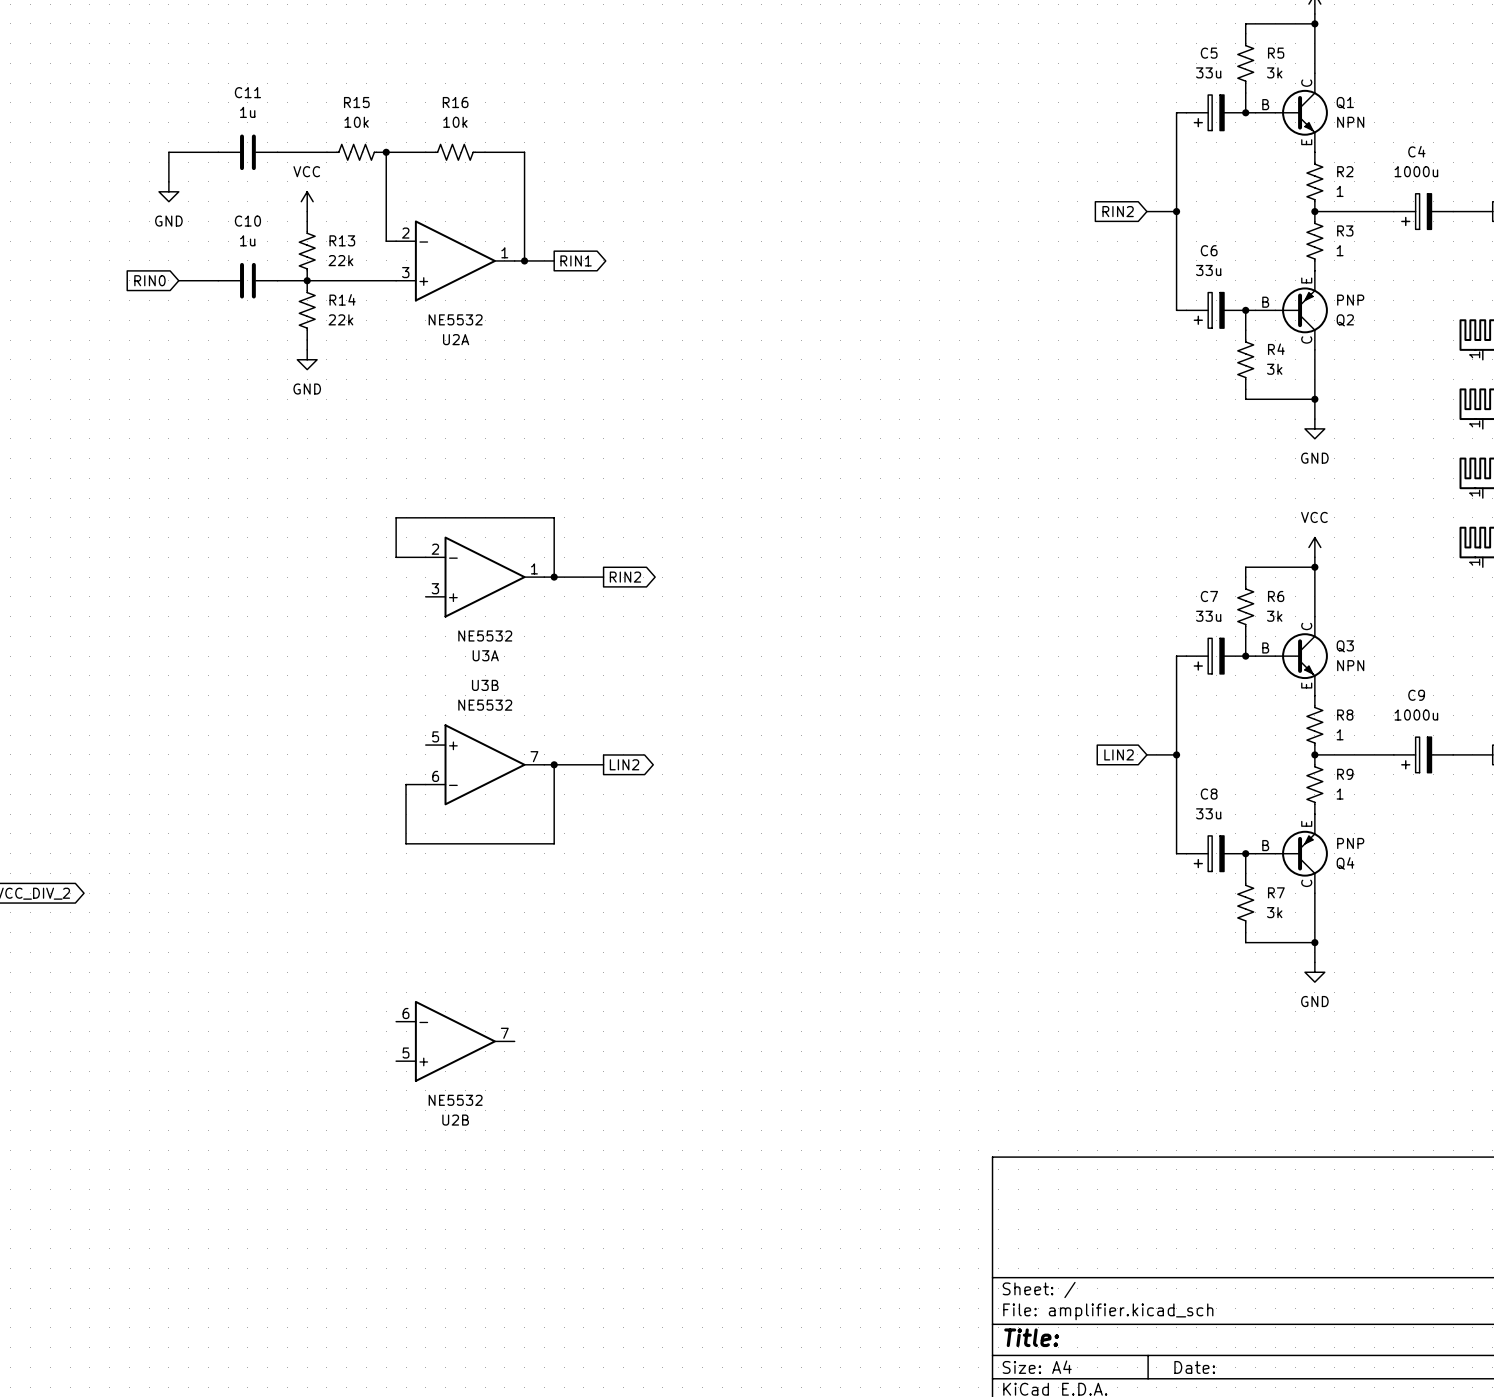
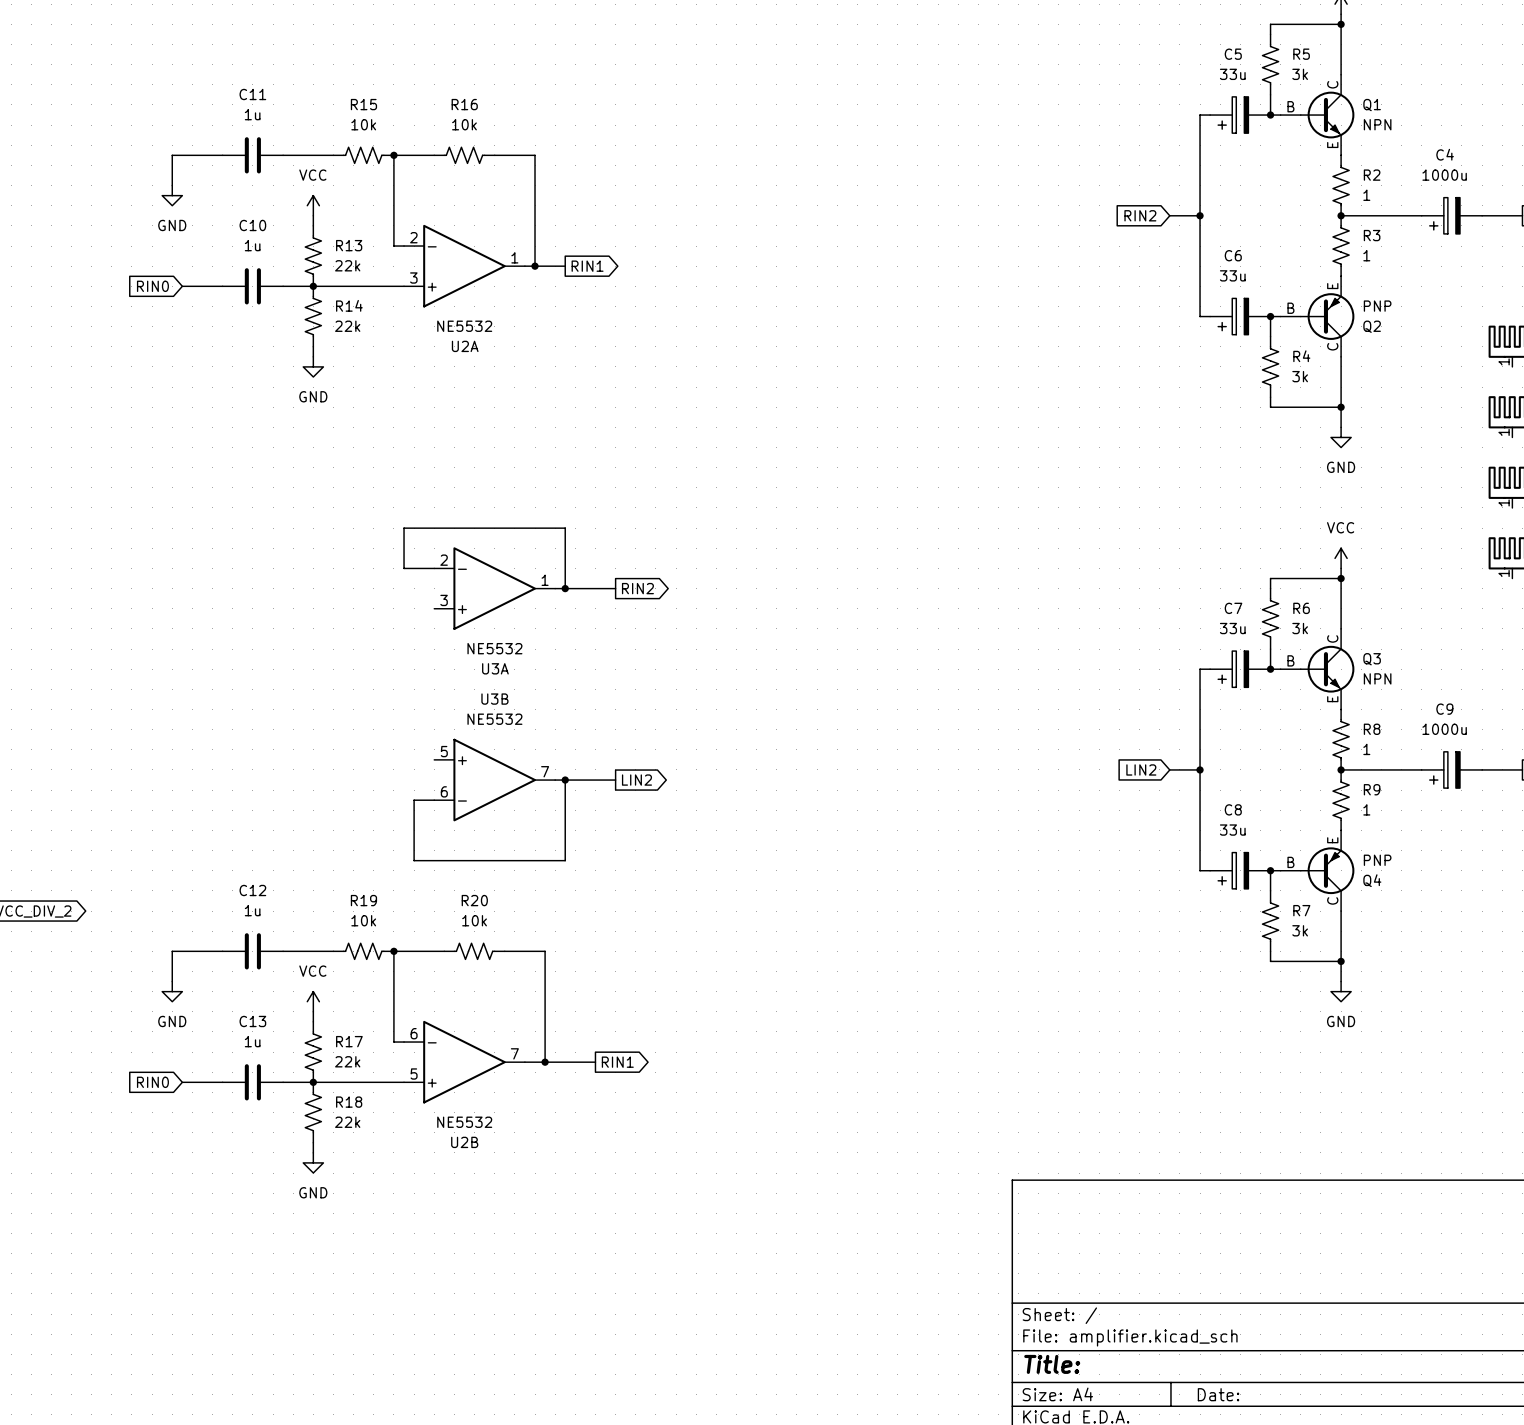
wire: none -> (222, 951) (172, 951) (172, 981)
C12: none -> 1u (252, 951)
wire: none -> (283, 951) (333, 951)
R19: none -> 10k (363, 951)
junction: none -> (393, 951)
wire: none -> (444, 951) (393, 951) (393, 1042) (404, 1042)
R20: none -> 10k (474, 951)
wire: none -> (504, 951) (545, 951) (545, 1062)
power symbol: none -> GND (172, 991)
power symbol: none -> VCC (313, 1001)
wire: none -> (313, 1011) (313, 1021)
R17: none -> 22k (313, 1052)
wire: none -> (524, 1062) (595, 1062)
junction: none -> (545, 1062)
global label: none -> RIN1 (617, 1062)
global label: none -> RIN0 (152, 1082)
wire: none -> (182, 1082) (222, 1082)
C13: none -> 1u (252, 1082)
wire: none -> (283, 1082) (404, 1082)
junction: none -> (313, 1082)
R18: none -> 22k (313, 1112)
wire: none -> (313, 1142) (313, 1152)
power symbol: none -> GND (313, 1162)

